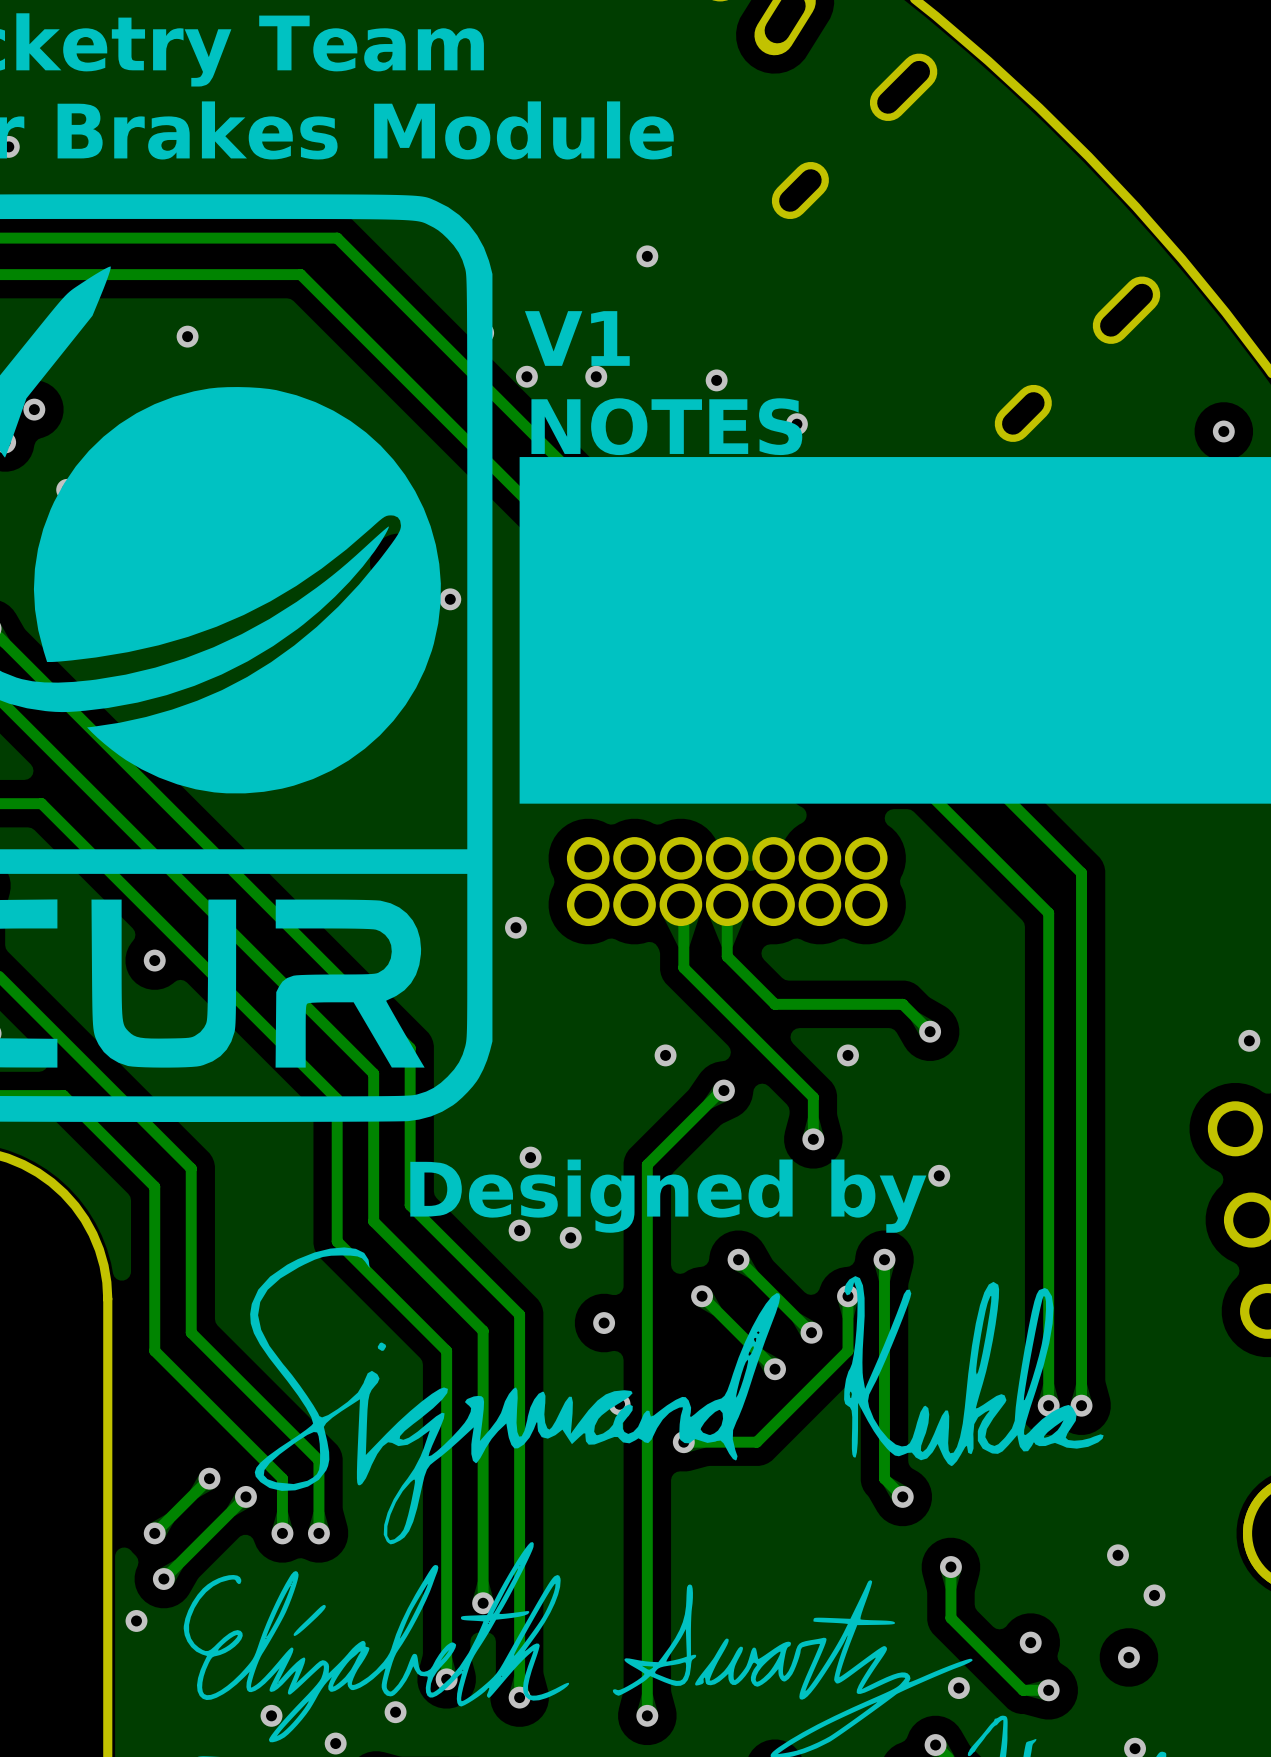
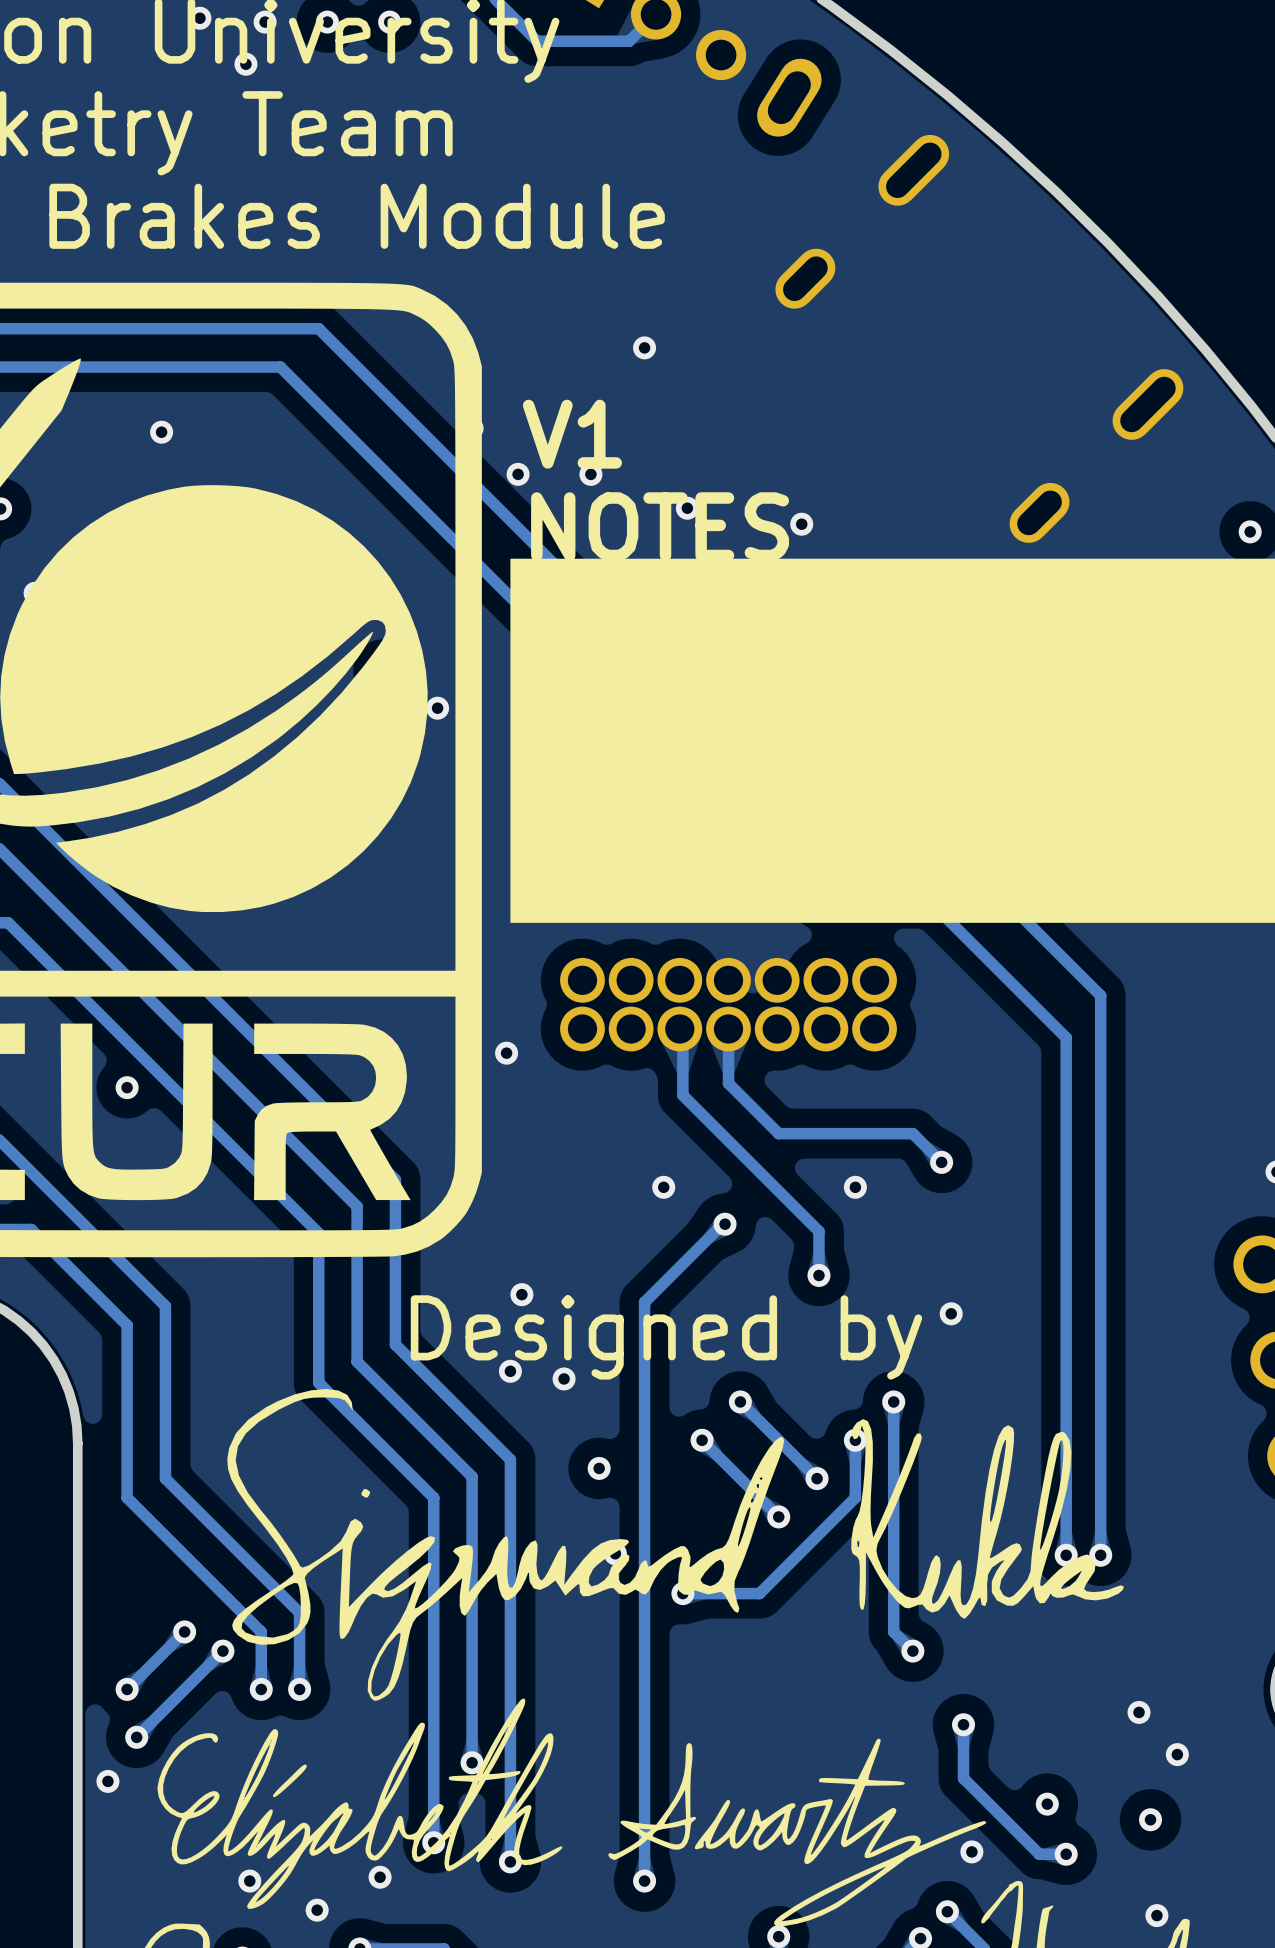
via position: (716, 380) -> (687, 508)

